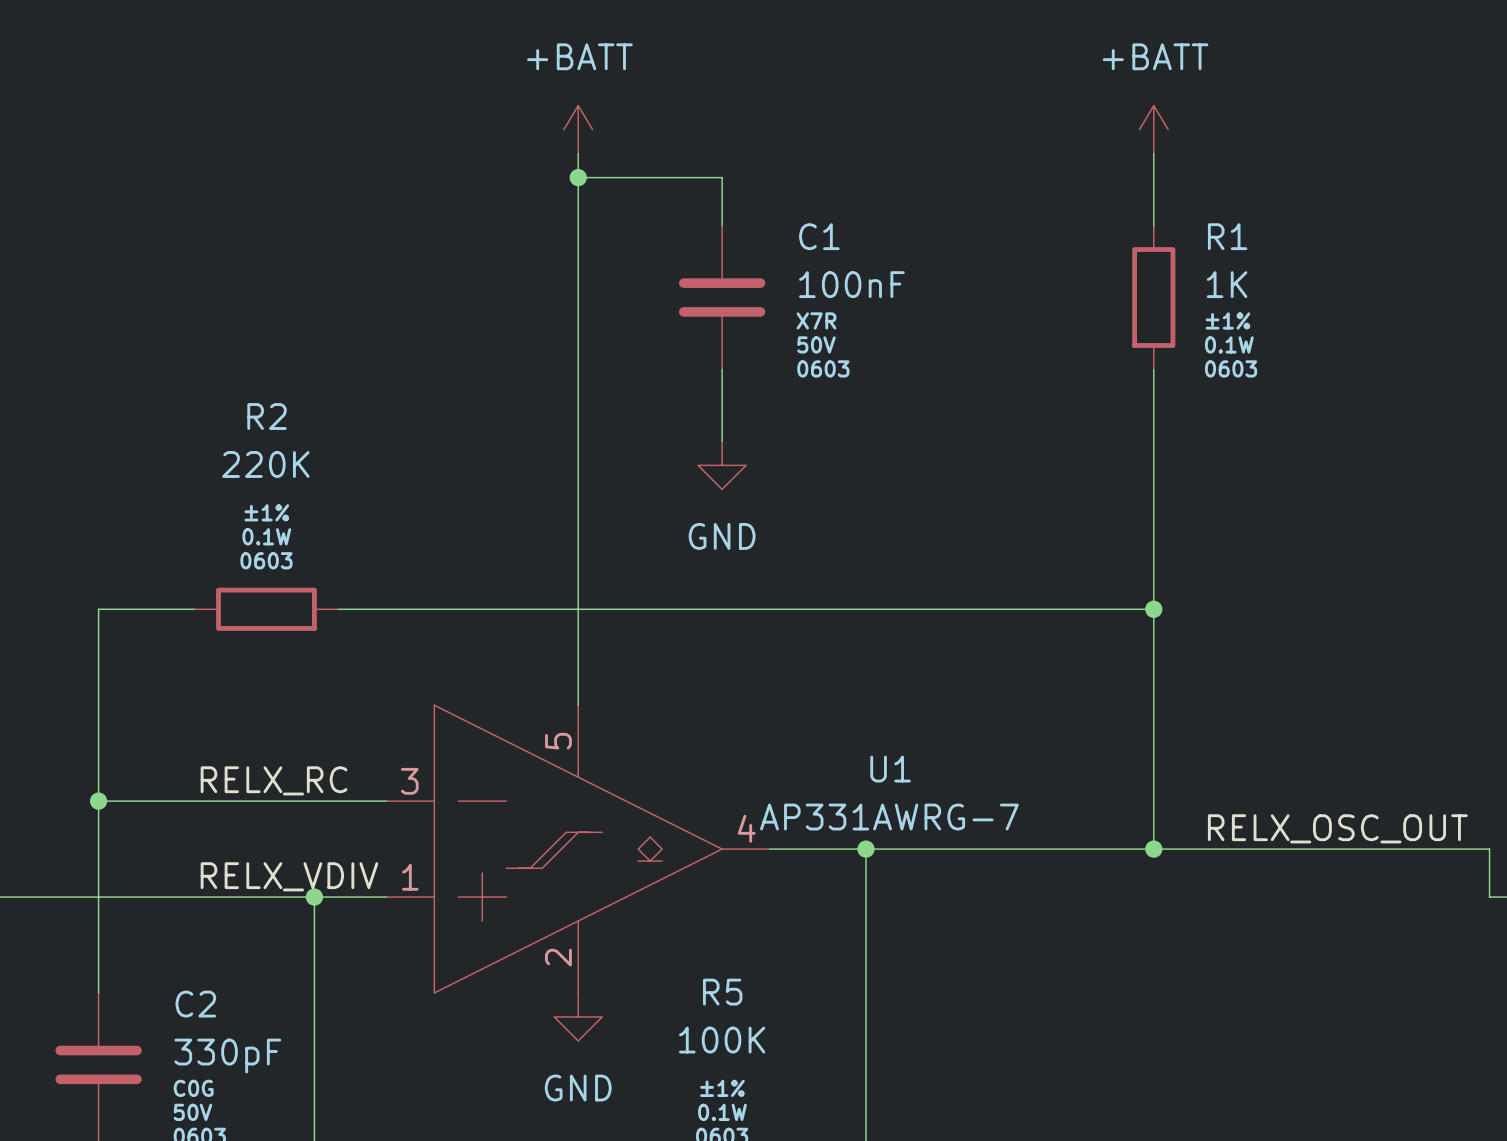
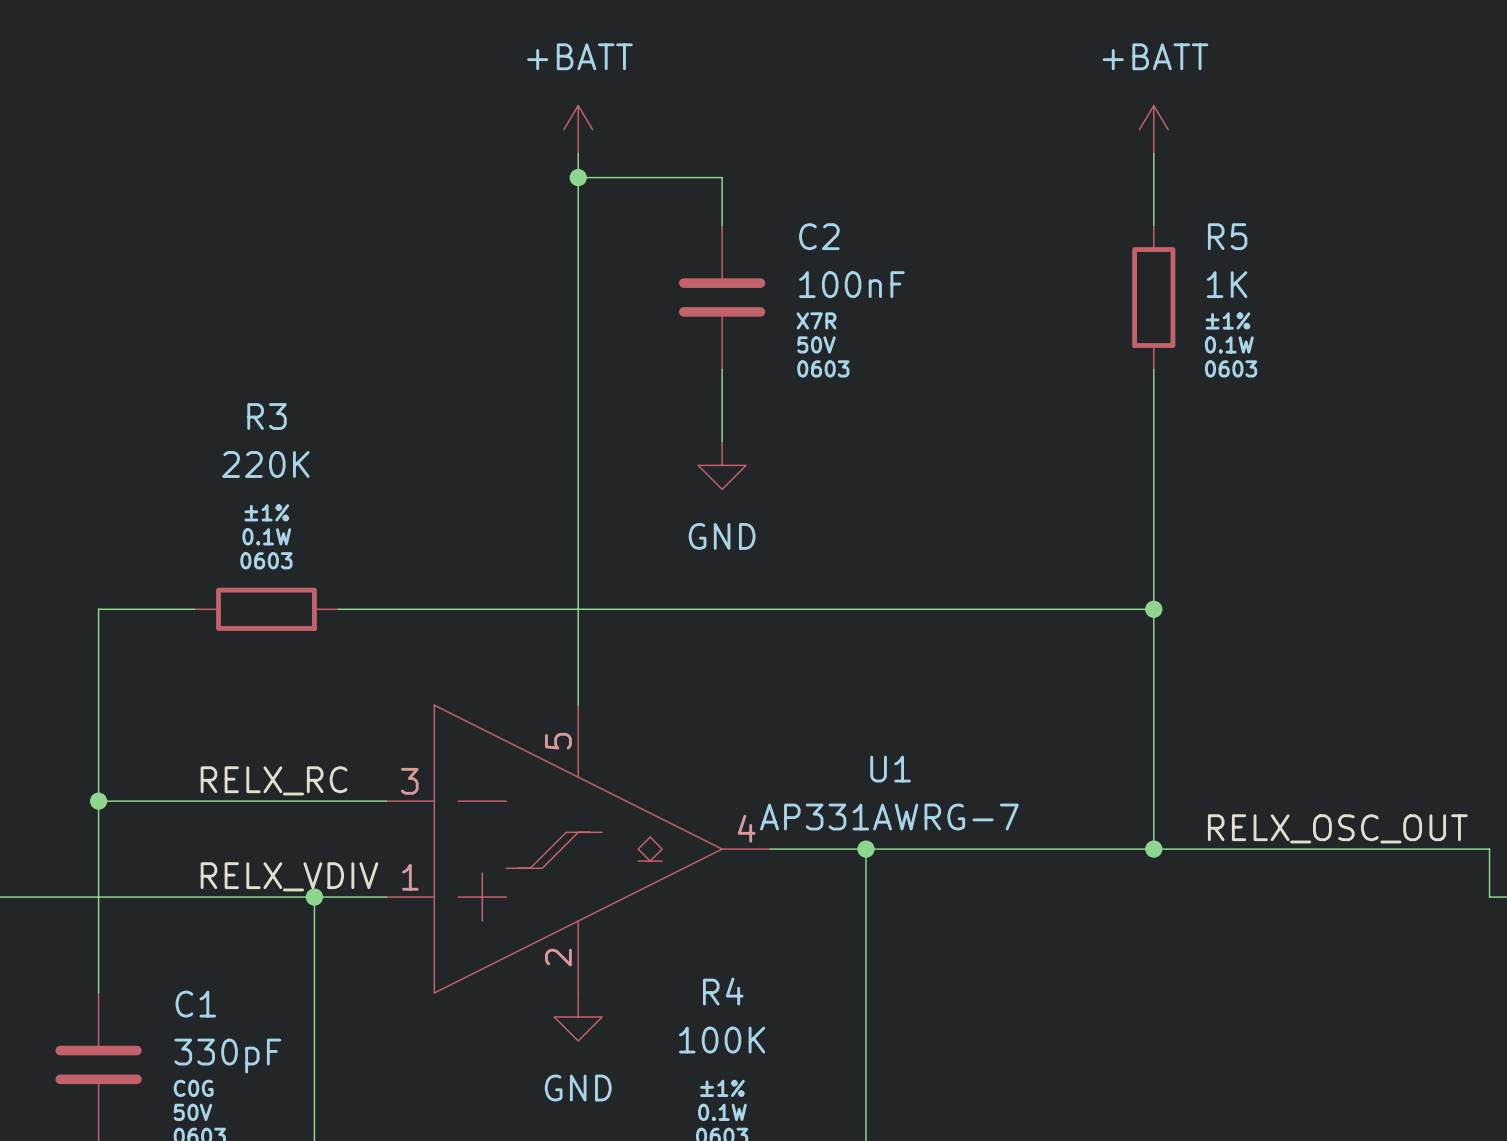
C1 name: C1 (819, 236) -> C2 (819, 236)
R1 name: R1 (1227, 236) -> R5 (1227, 236)
R2 name: R2 (267, 416) -> R3 (267, 416)
R5 name: R5 (722, 992) -> R4 (723, 991)
C2 name: C2 (195, 1004) -> C1 (195, 1004)

